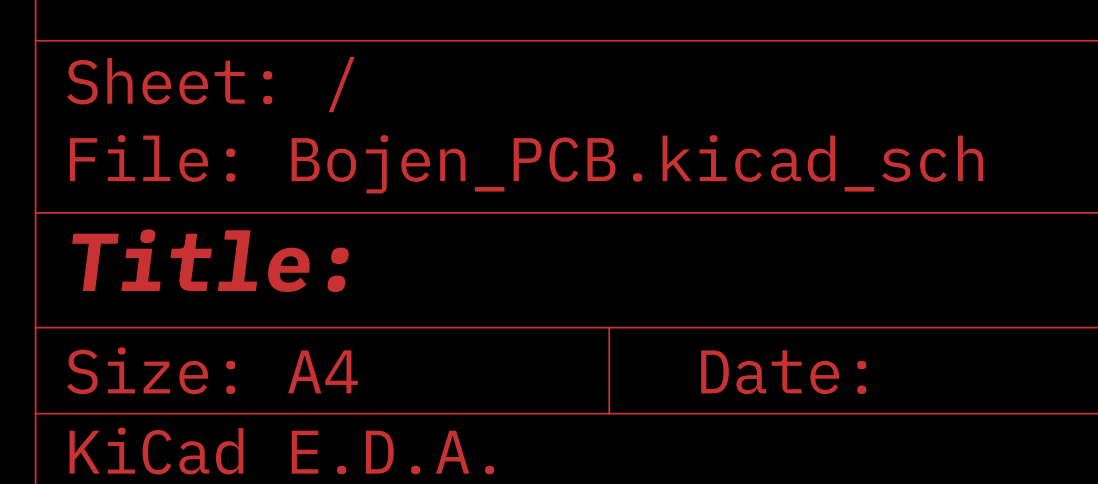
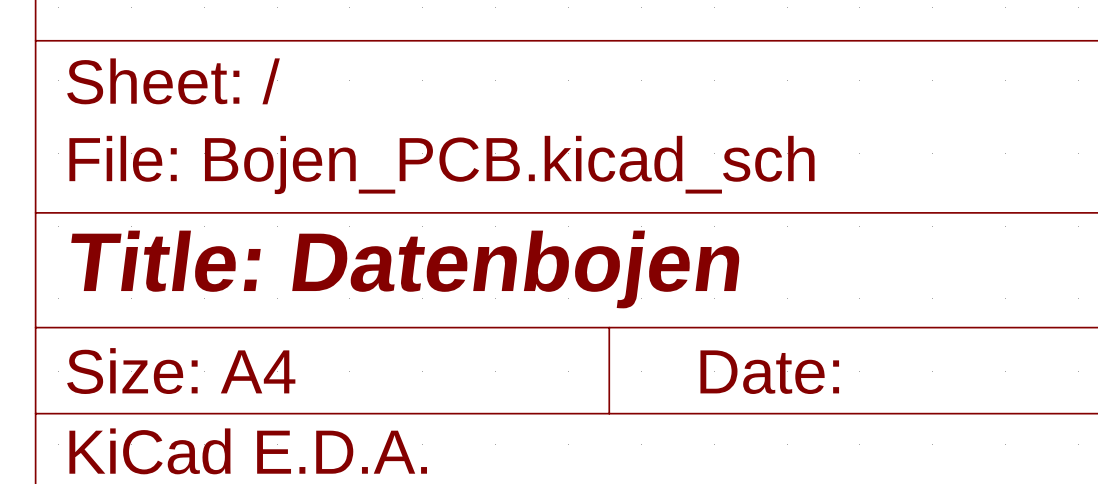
title block: Title: (210, 260) -> Title: Datenbojen (405, 269)

